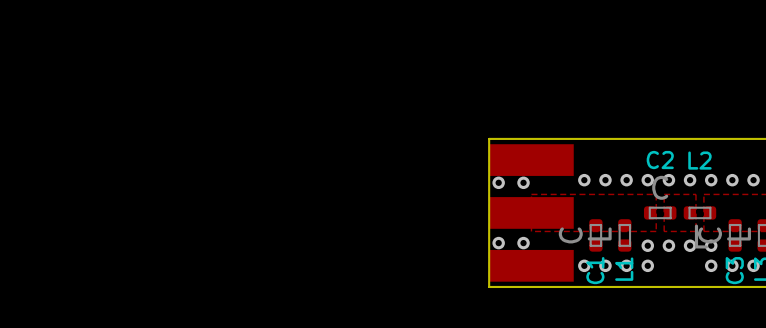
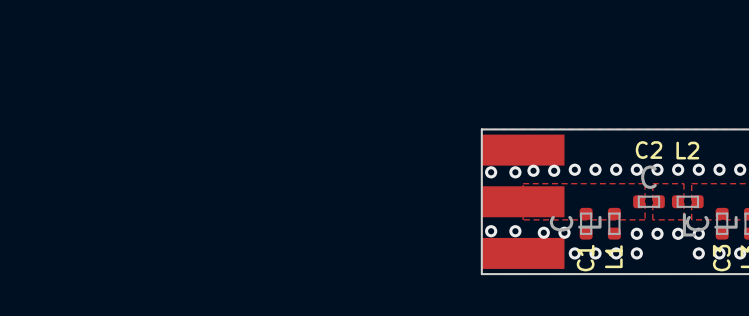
via: none -> (533, 170)
via: none -> (554, 170)
via: none -> (543, 232)
via: none -> (564, 232)

